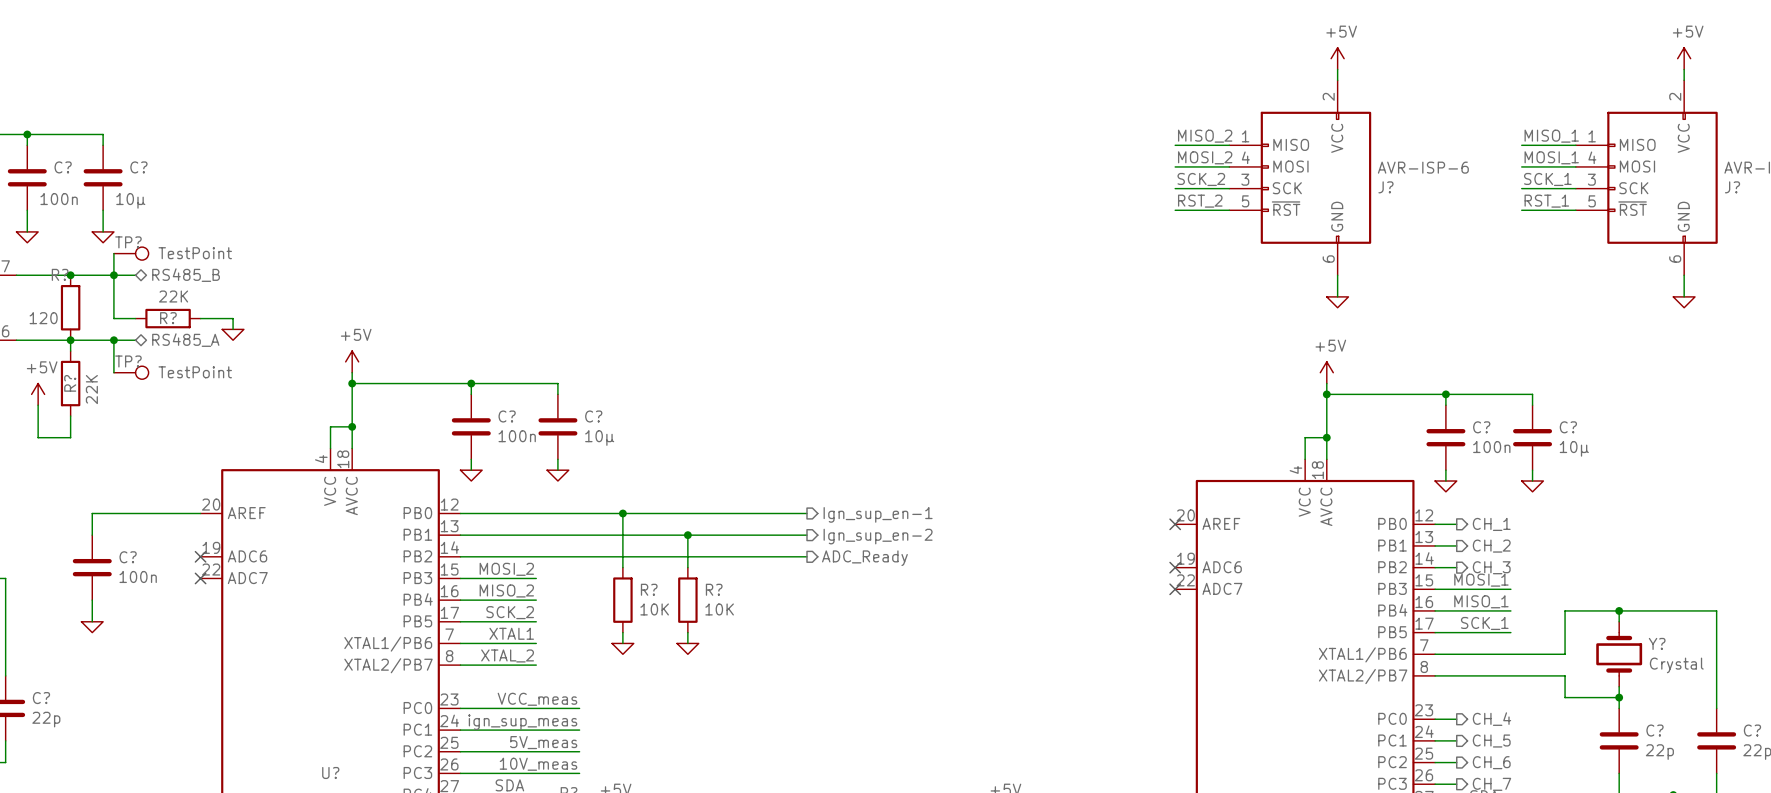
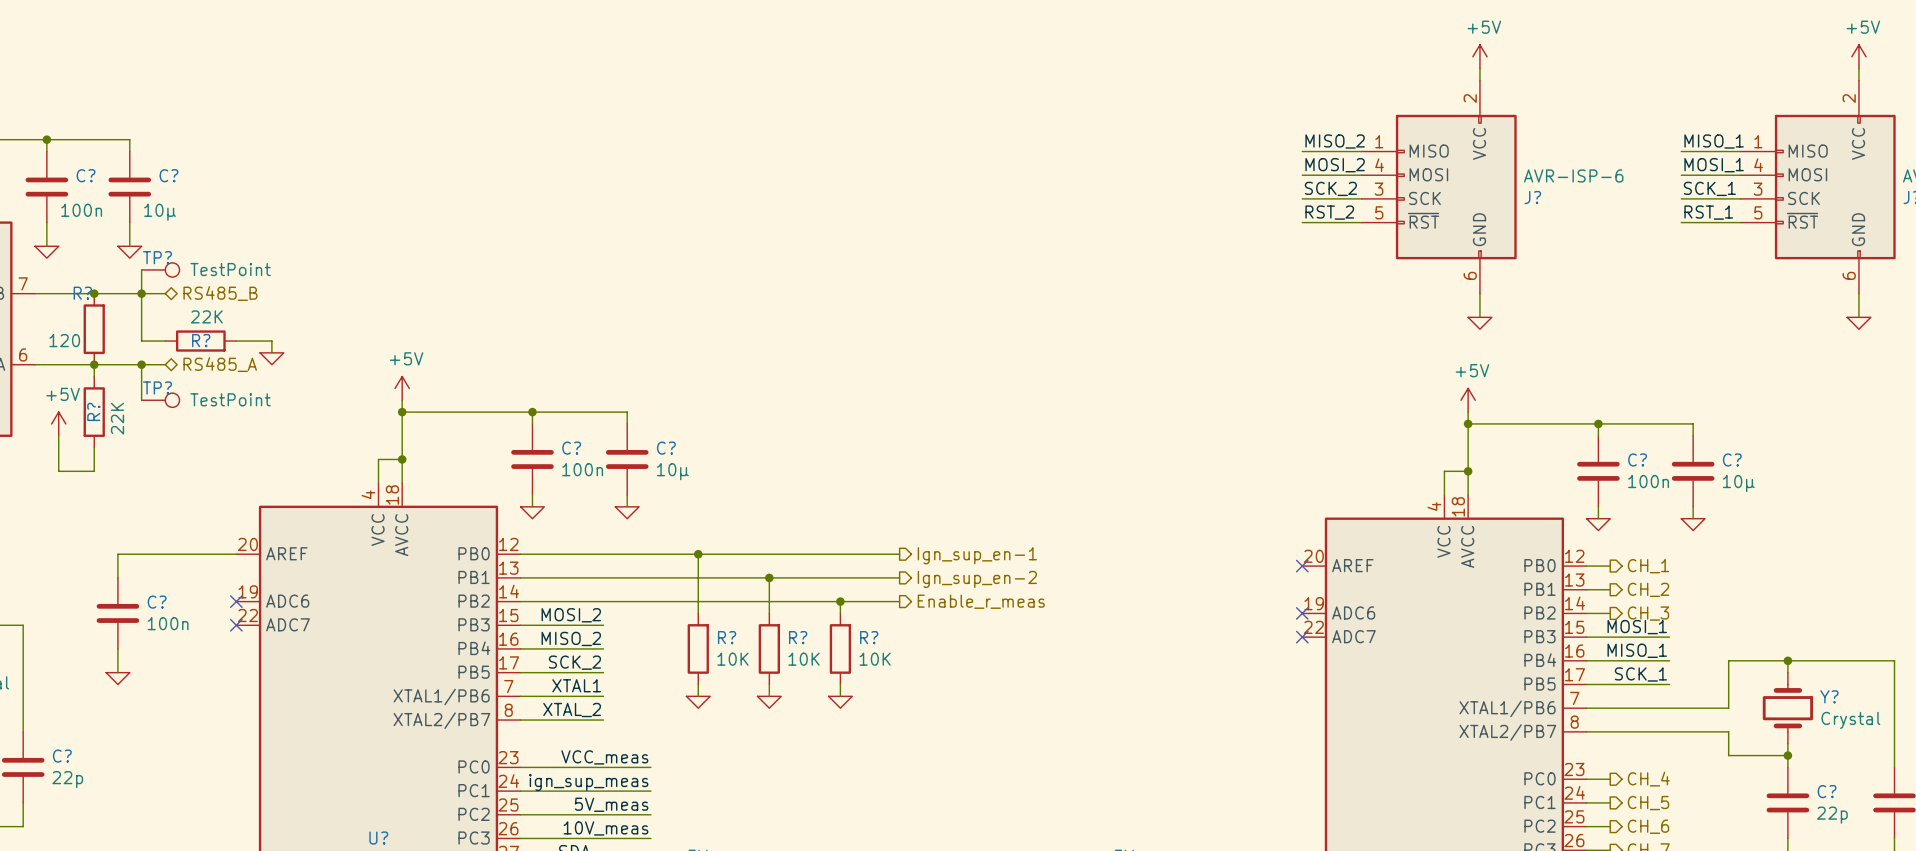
wire: none -> (840, 601) (840, 613)
junction: none -> (840, 601)
hierarchical label: ADC_Ready (864, 558) -> Enable_r_meas (981, 601)
R?: none -> 10K (840, 648)
wire: none -> (840, 684) (840, 696)
power symbol: none -> (840, 702)

